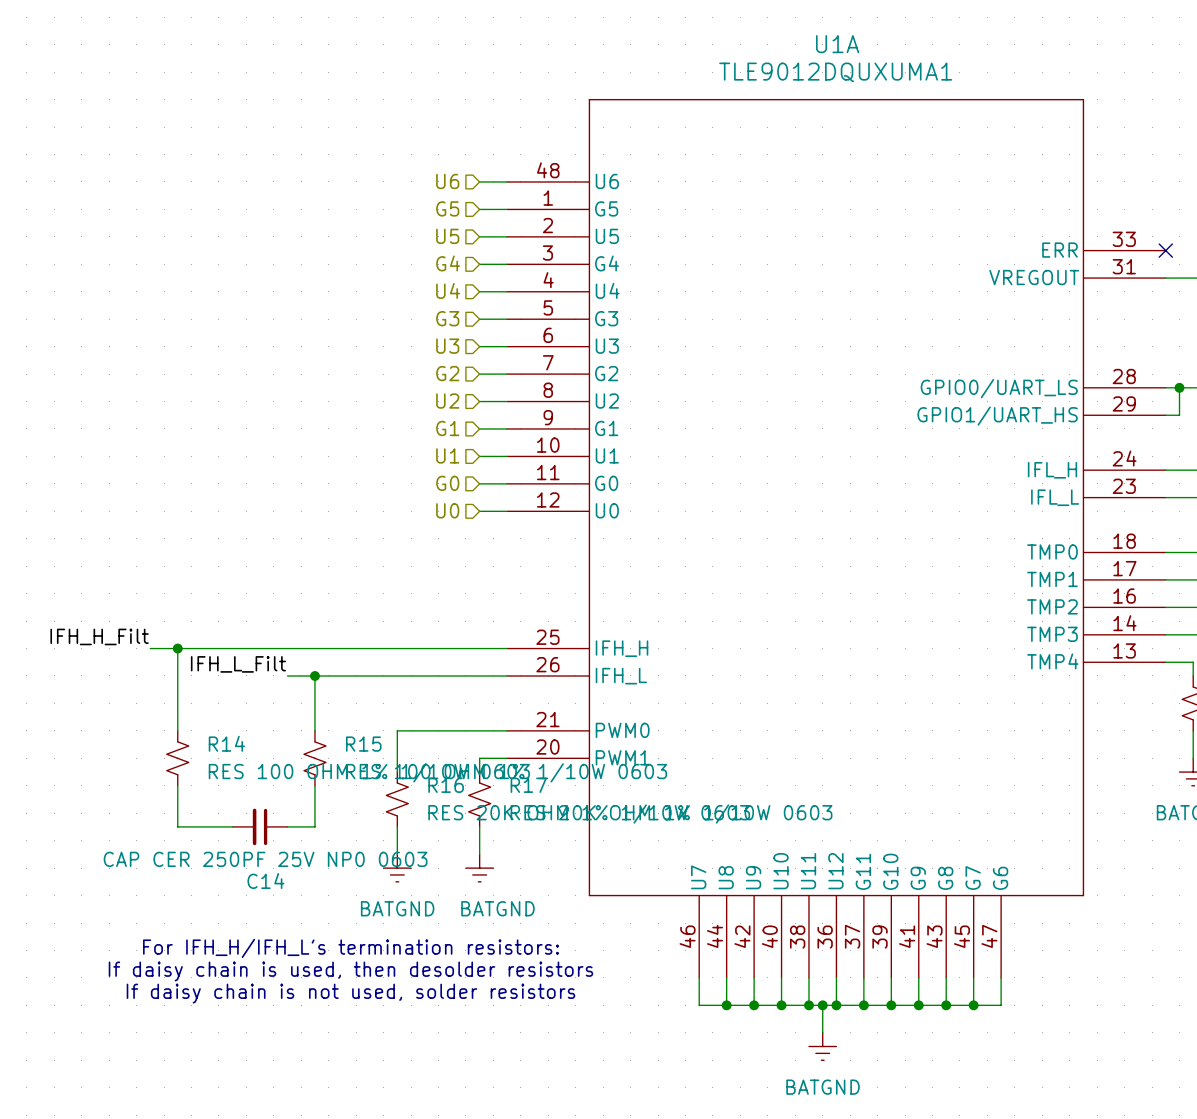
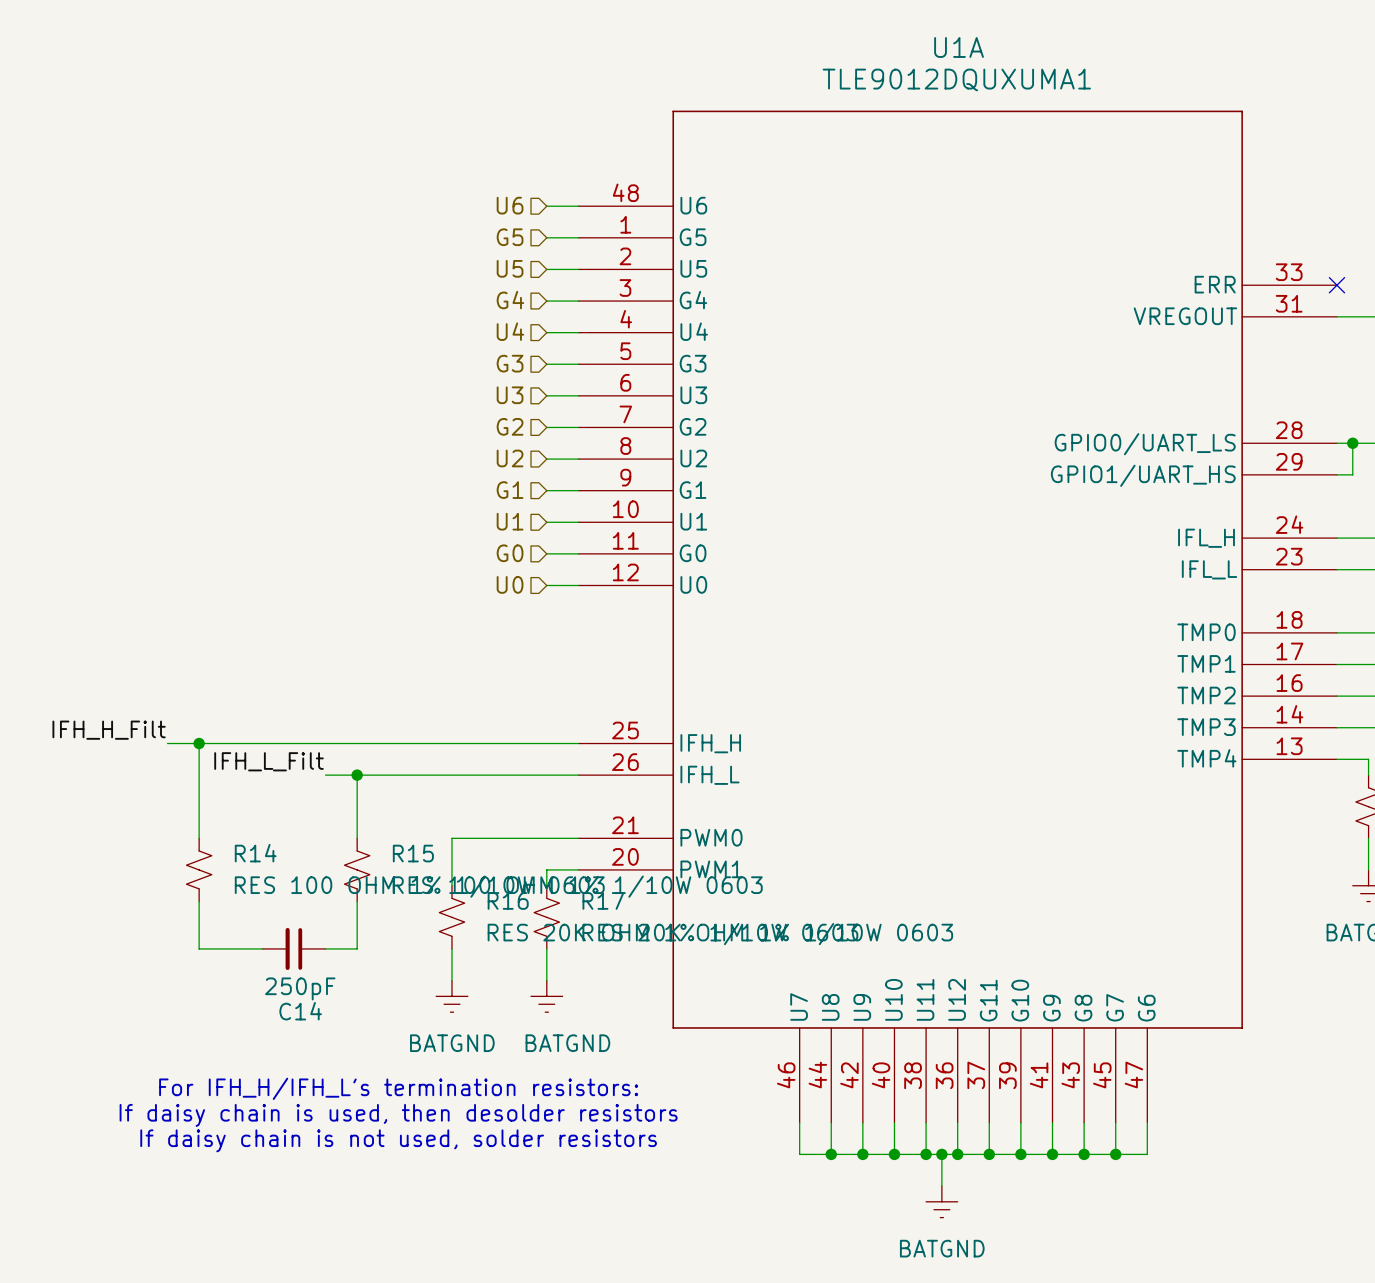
C14 value: CAP CER 250PF 25V NP0 0603 (265, 859) -> 250pF (300, 988)

